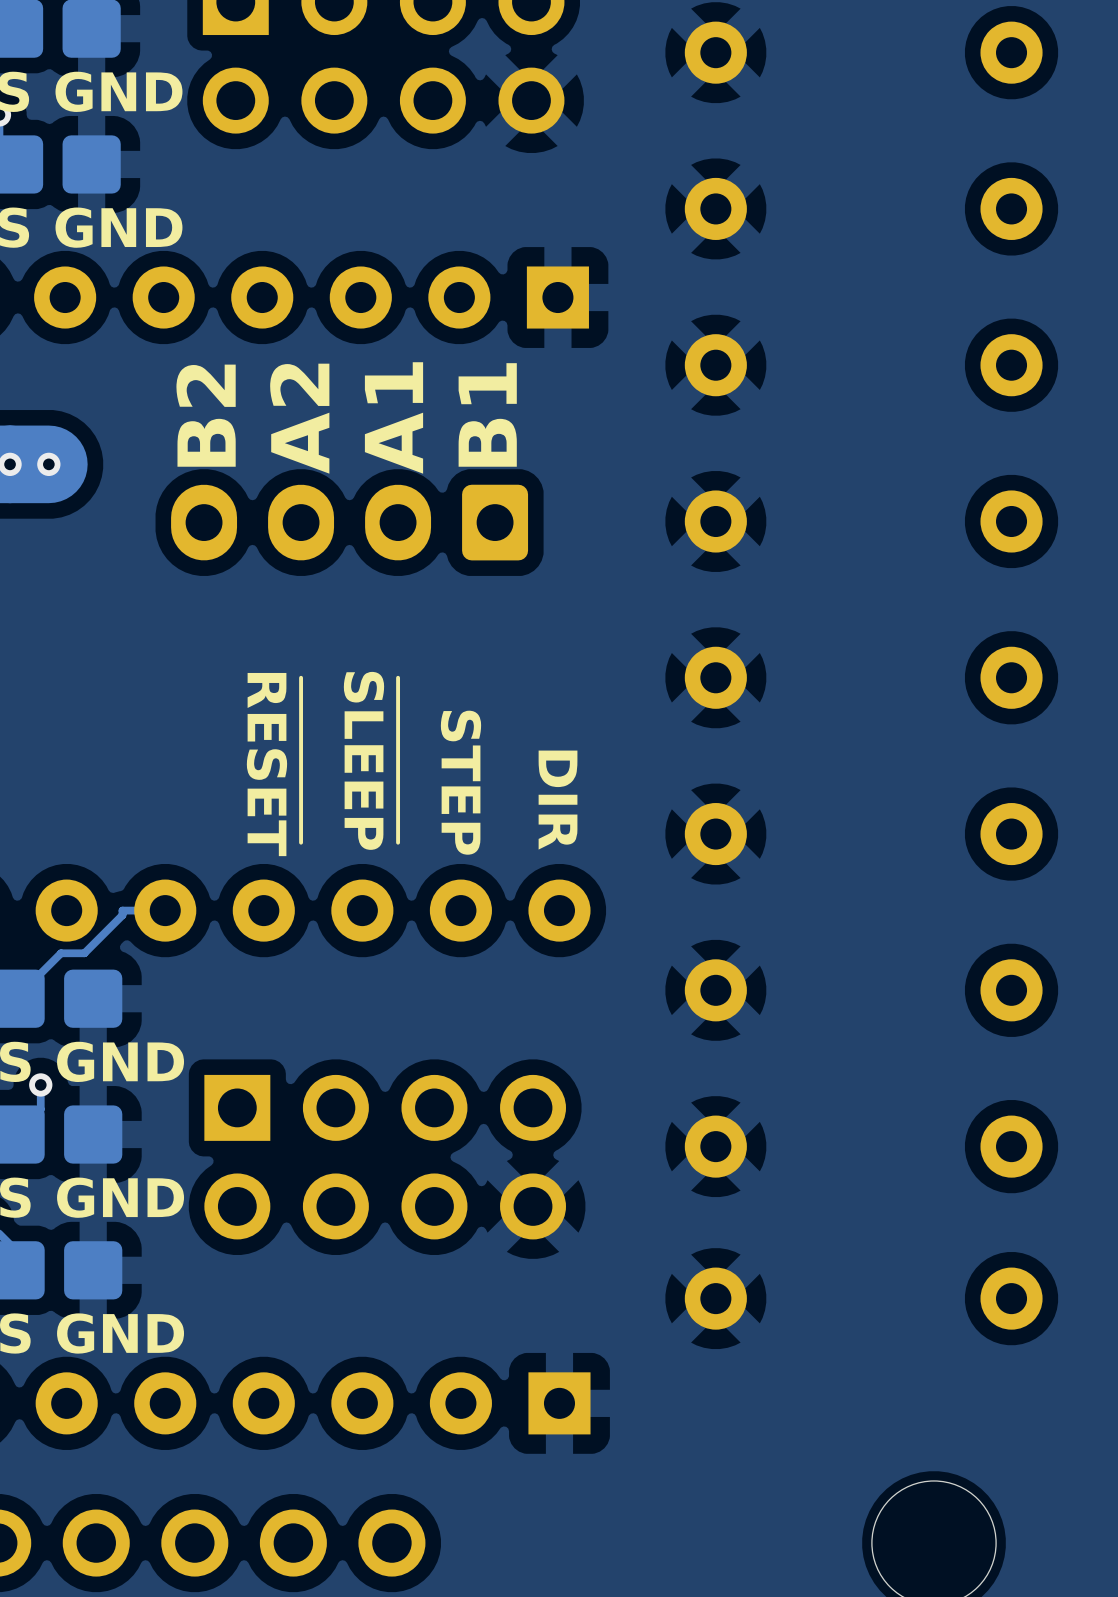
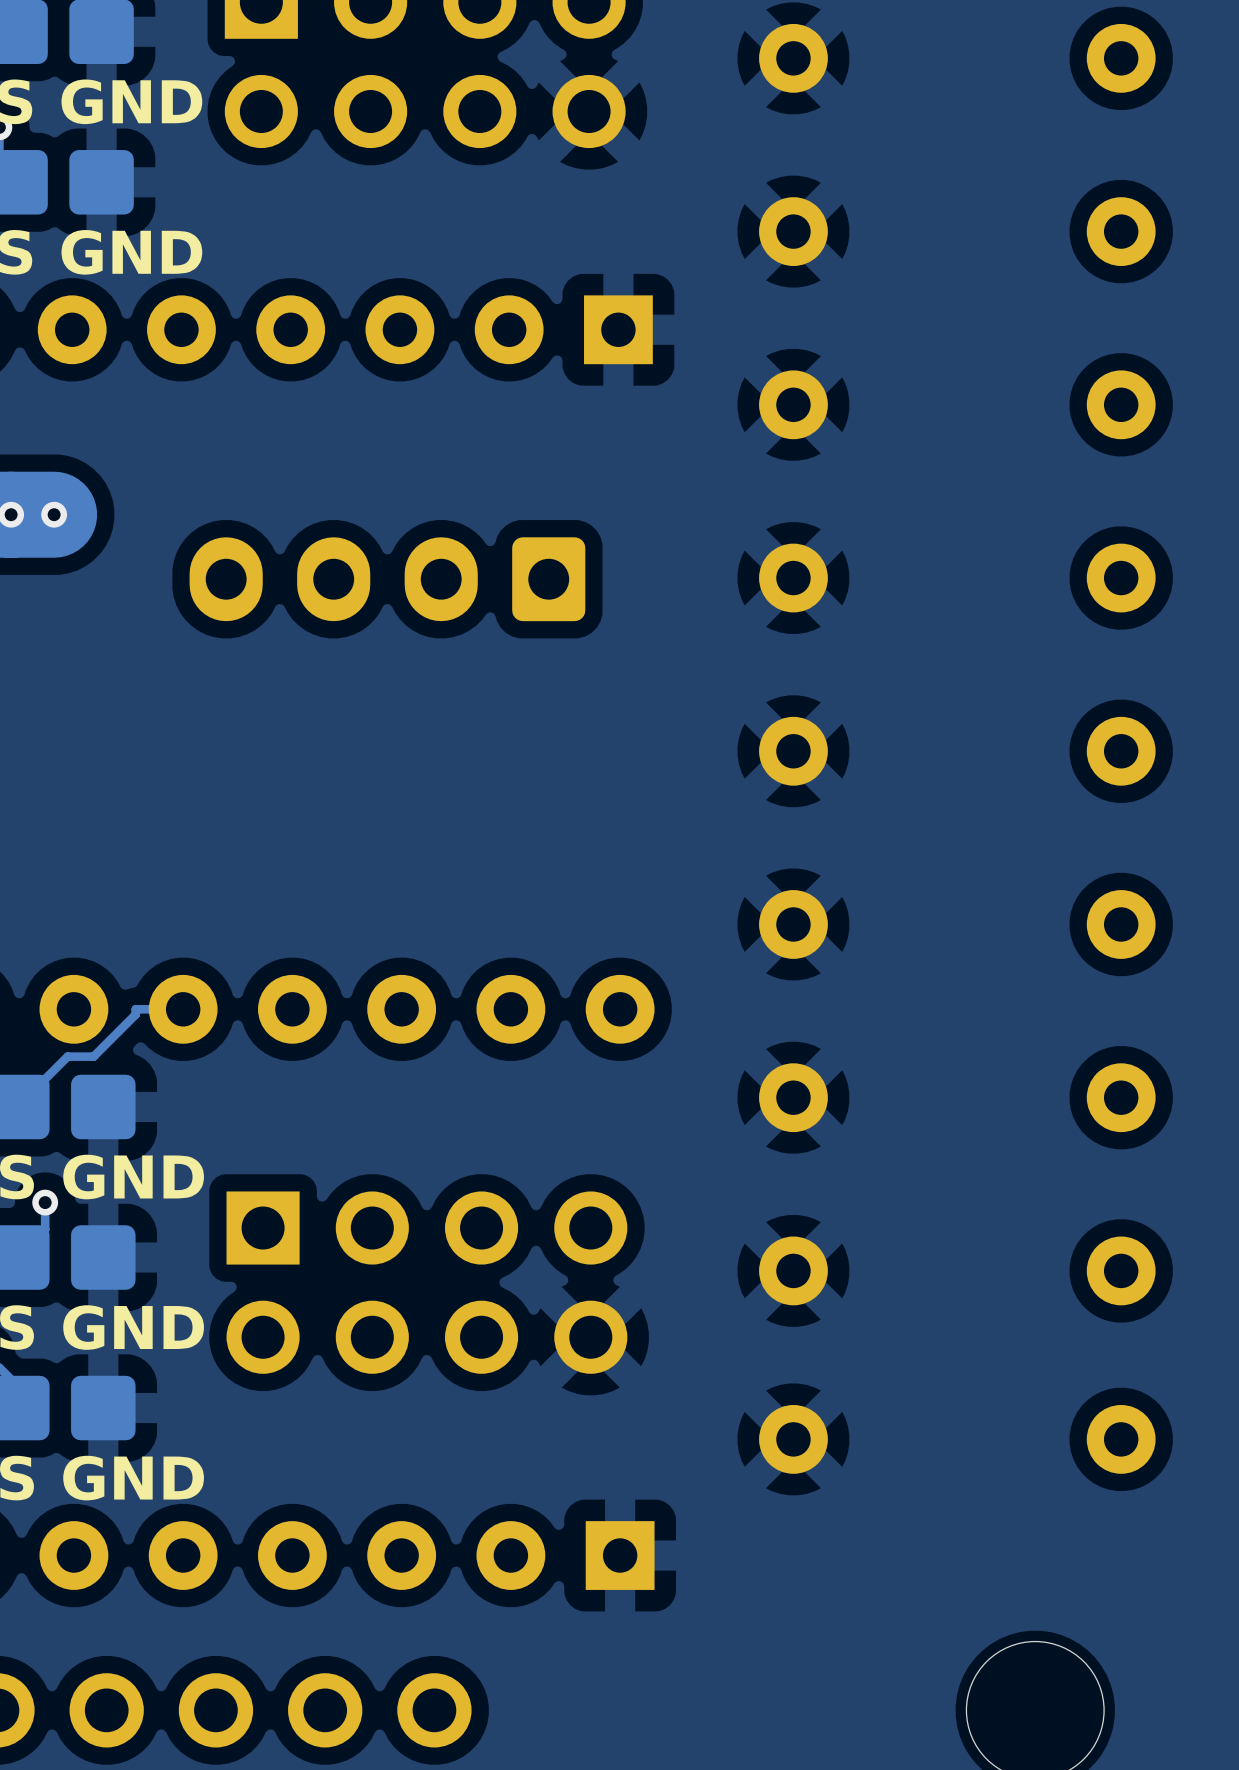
text: B1 (487, 414) -> none
text: B2 (206, 415) -> none
text: A1 (394, 417) -> none
text: A2 (299, 418) -> none
line: (301, 677) (301, 842) -> none
line: (398, 677) (398, 842) -> none
text: SLEEP (363, 760) -> none
text: RESET (266, 764) -> none
text: STEP (460, 782) -> none
text: DIR (558, 800) -> none

